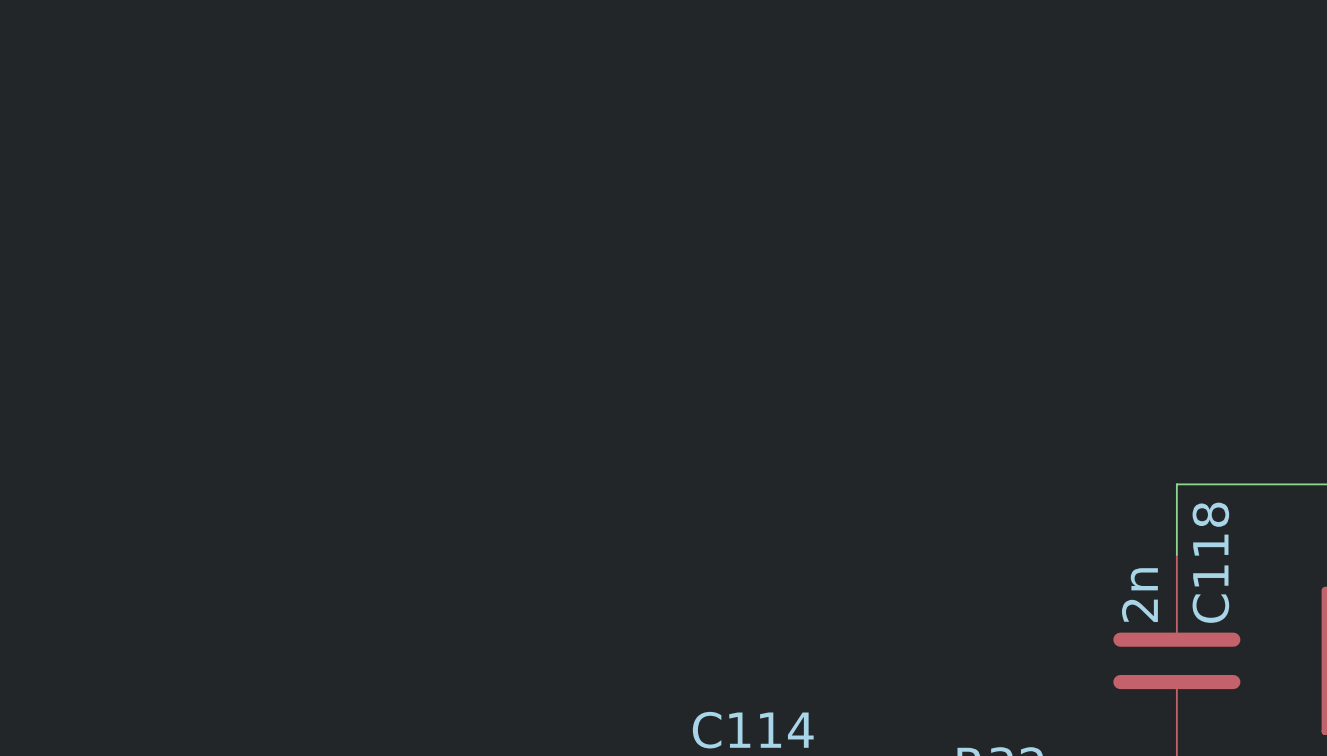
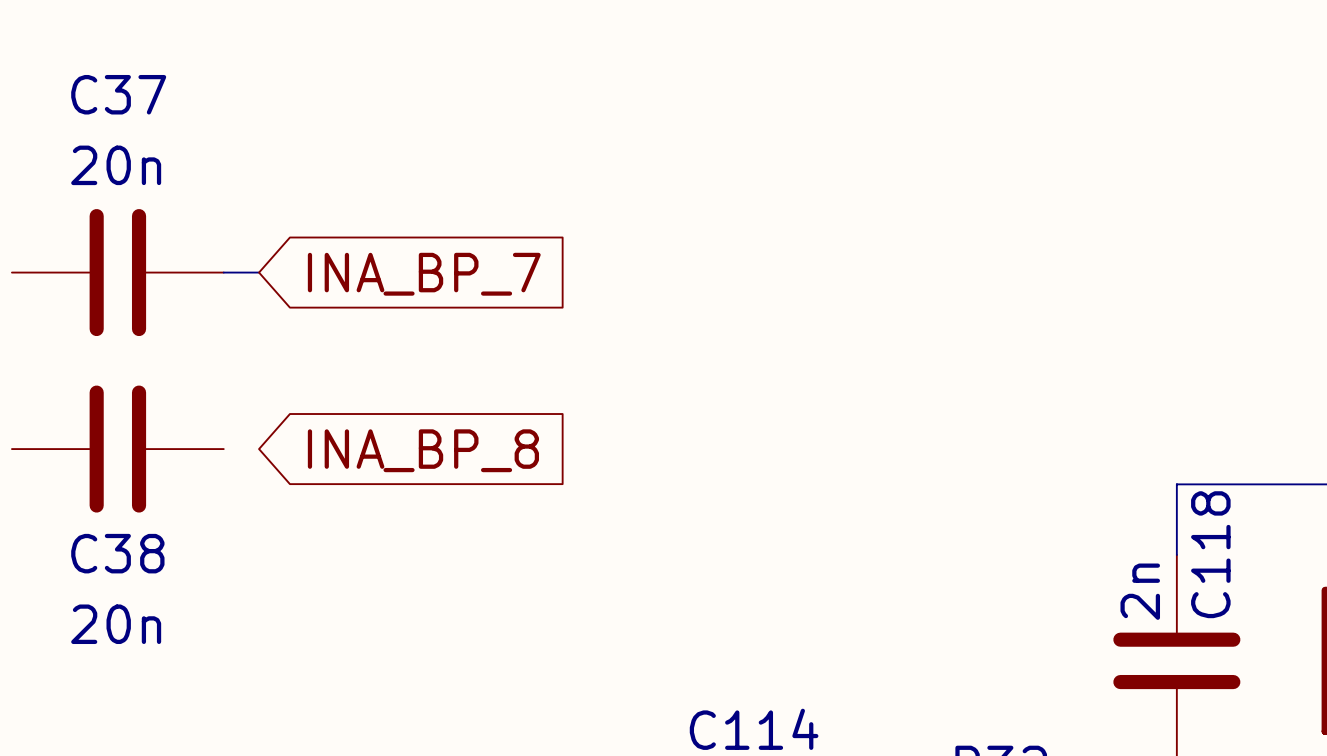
C37: none -> 20n (117, 272)
wire: none -> (223, 272) (259, 272)
global label: none -> INA_BP_7 (424, 274)
C38: none -> 20n (117, 449)
global label: none -> INA_BP_8 (423, 450)

